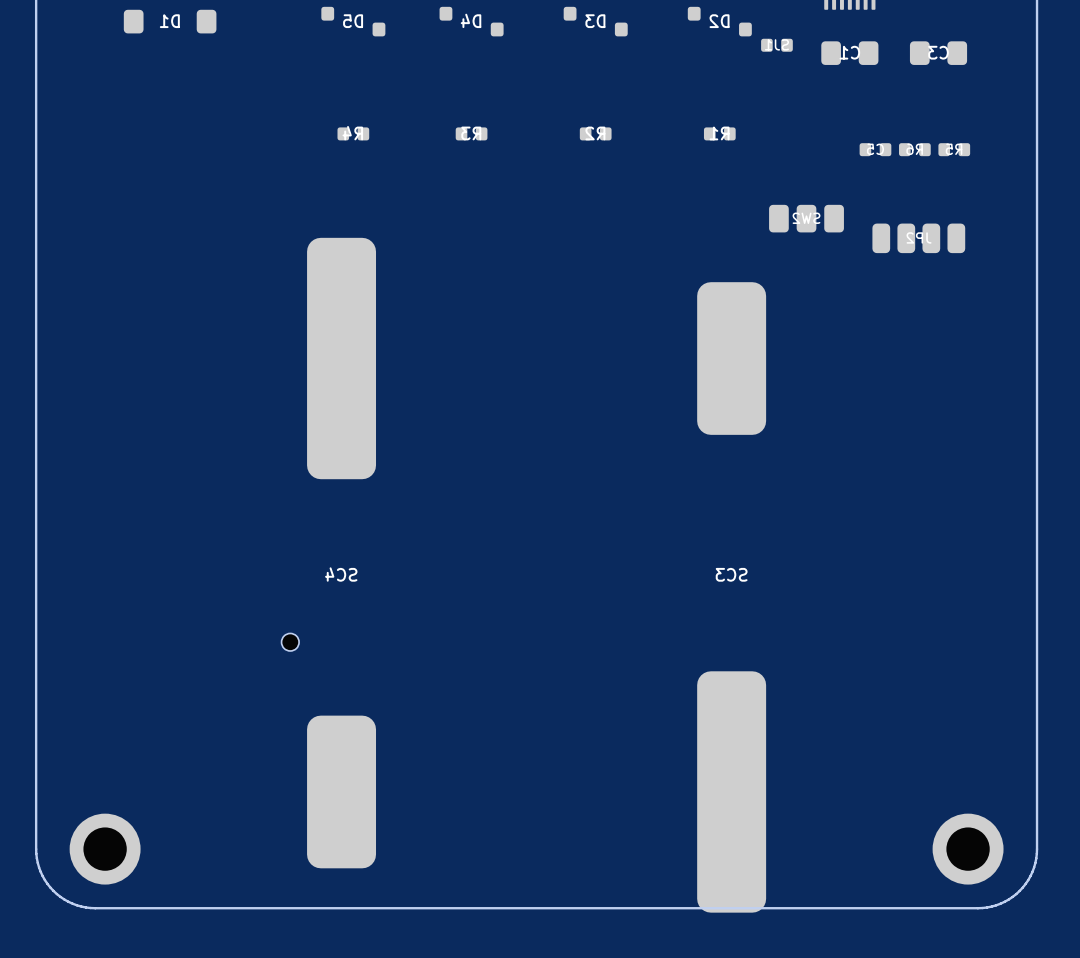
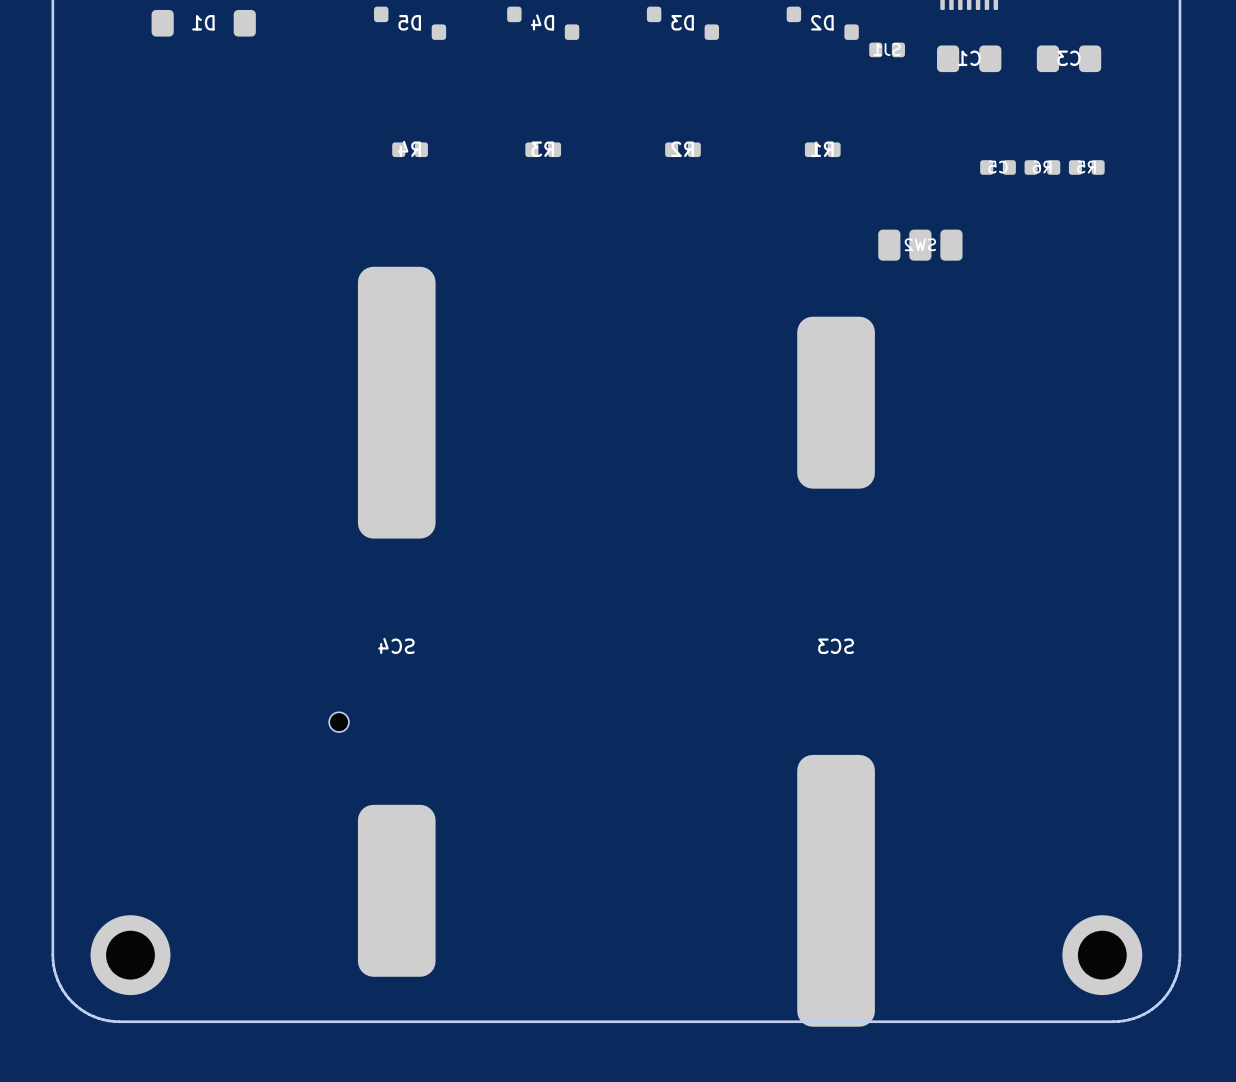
part: (918, 238) -> none

